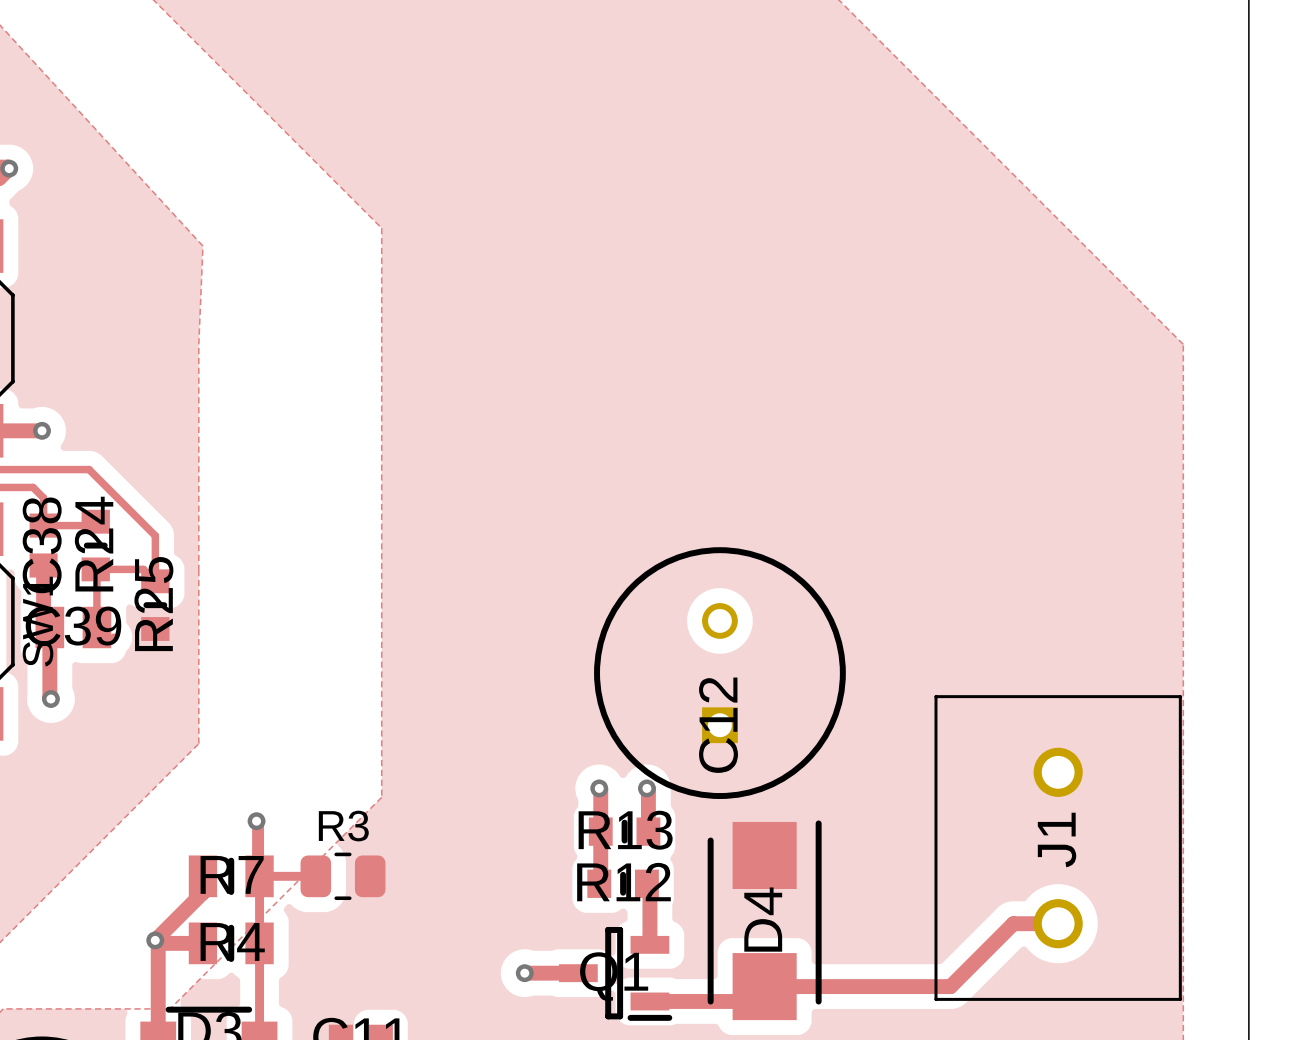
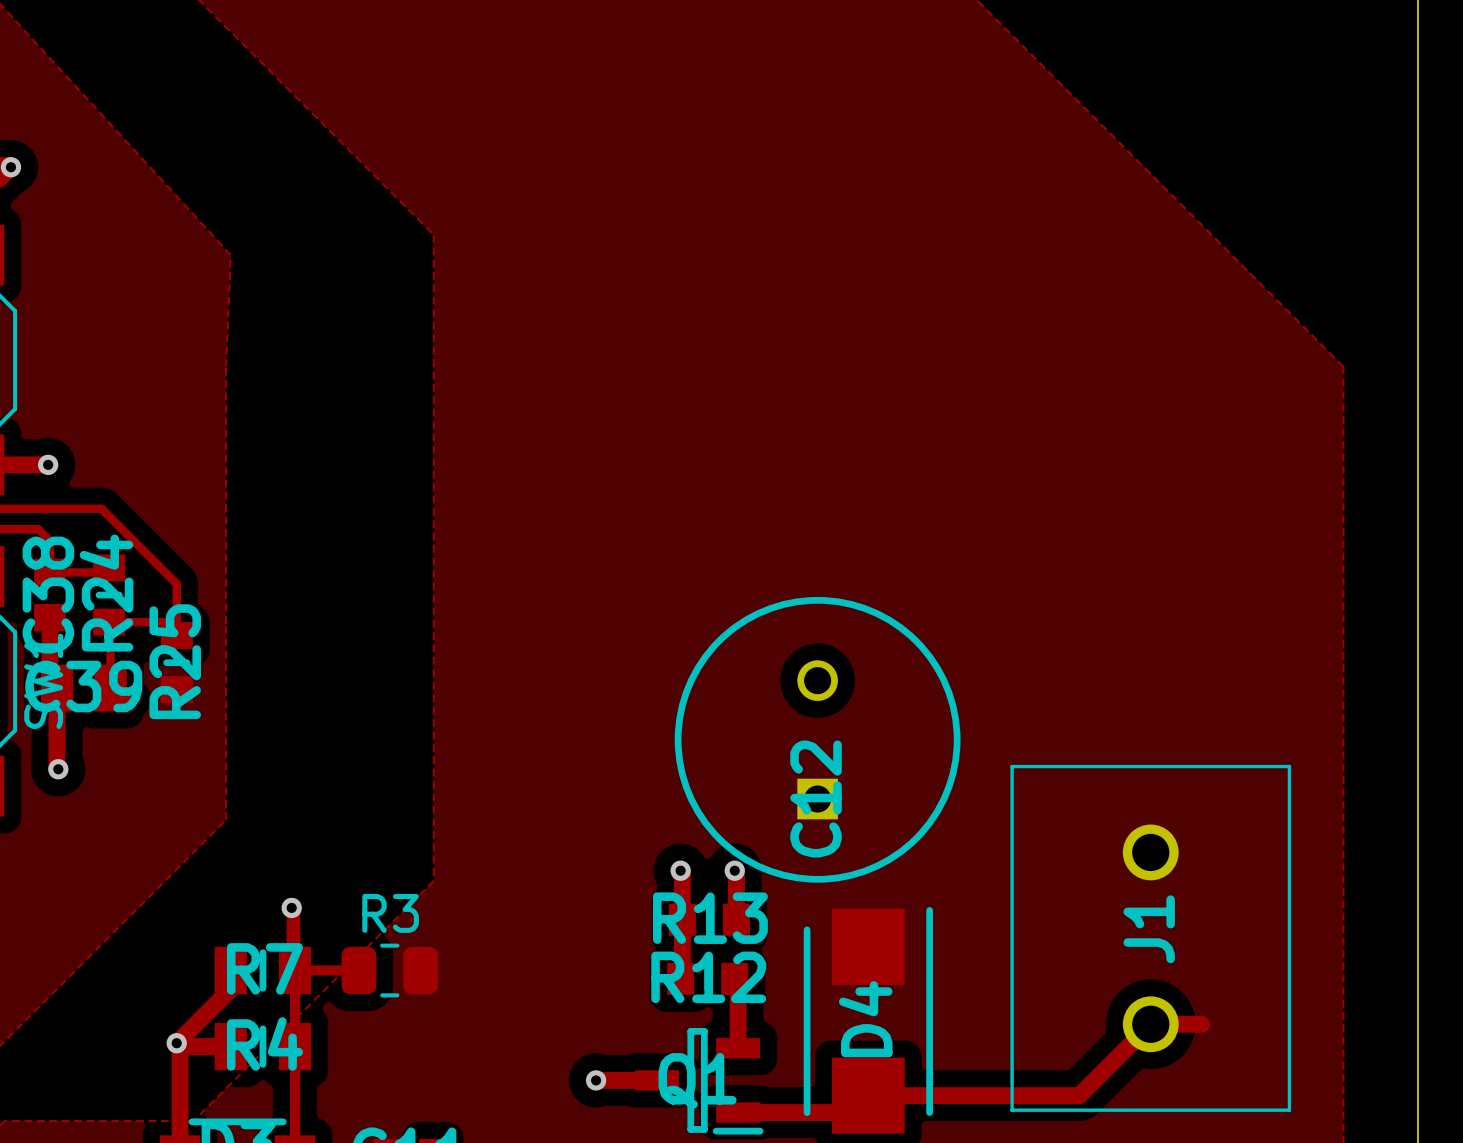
J1 position: (1058, 848) -> (1150, 938)

